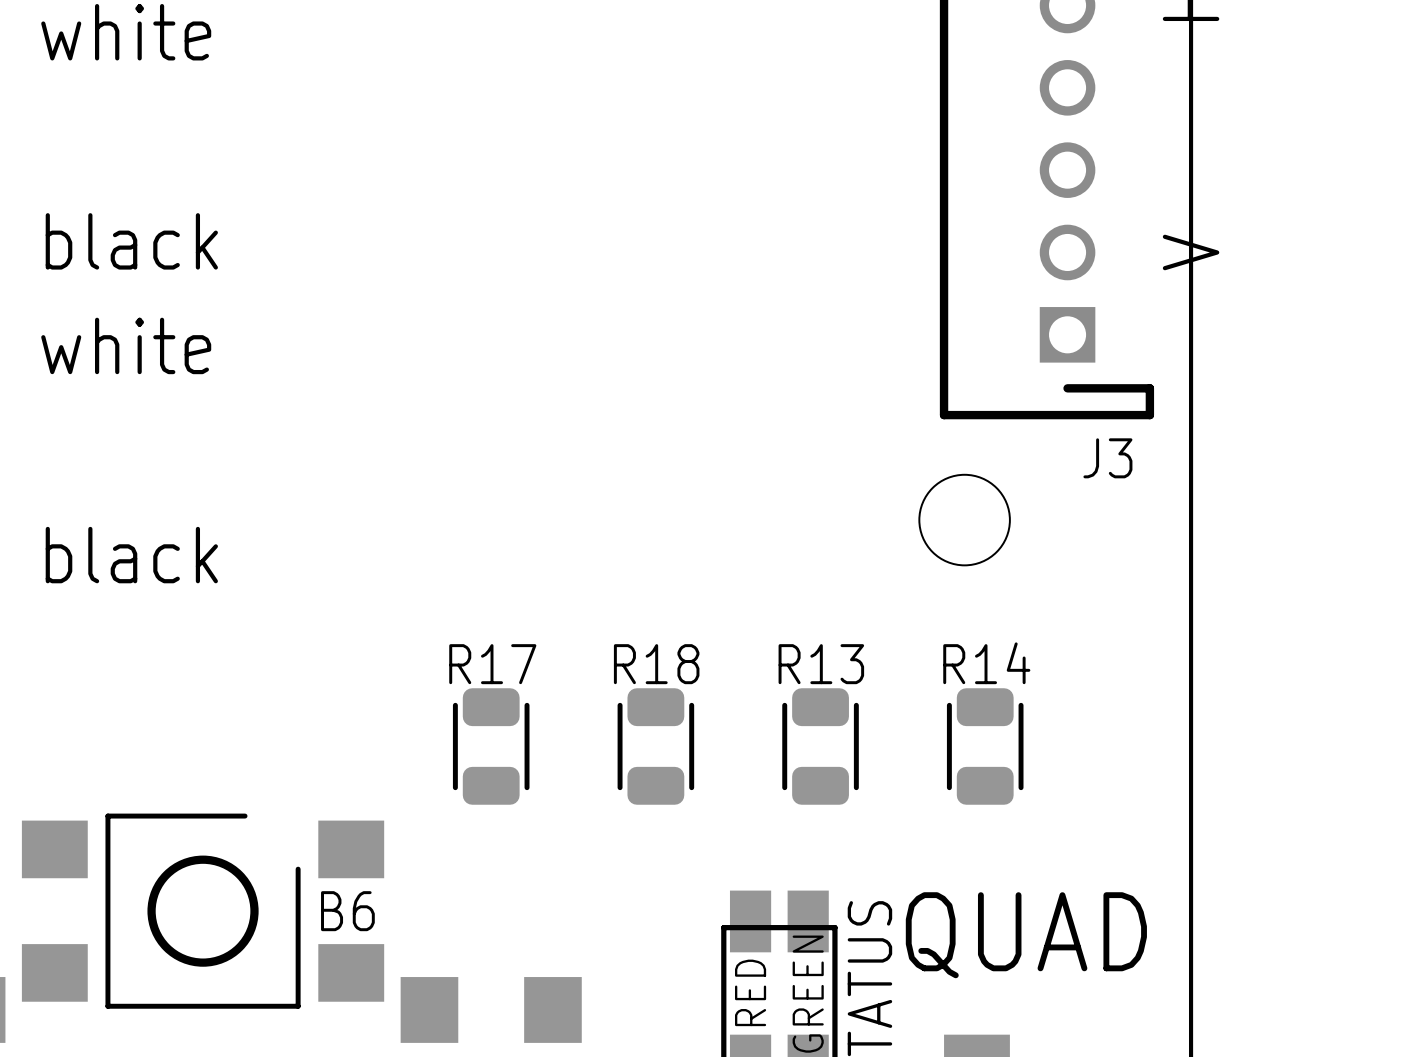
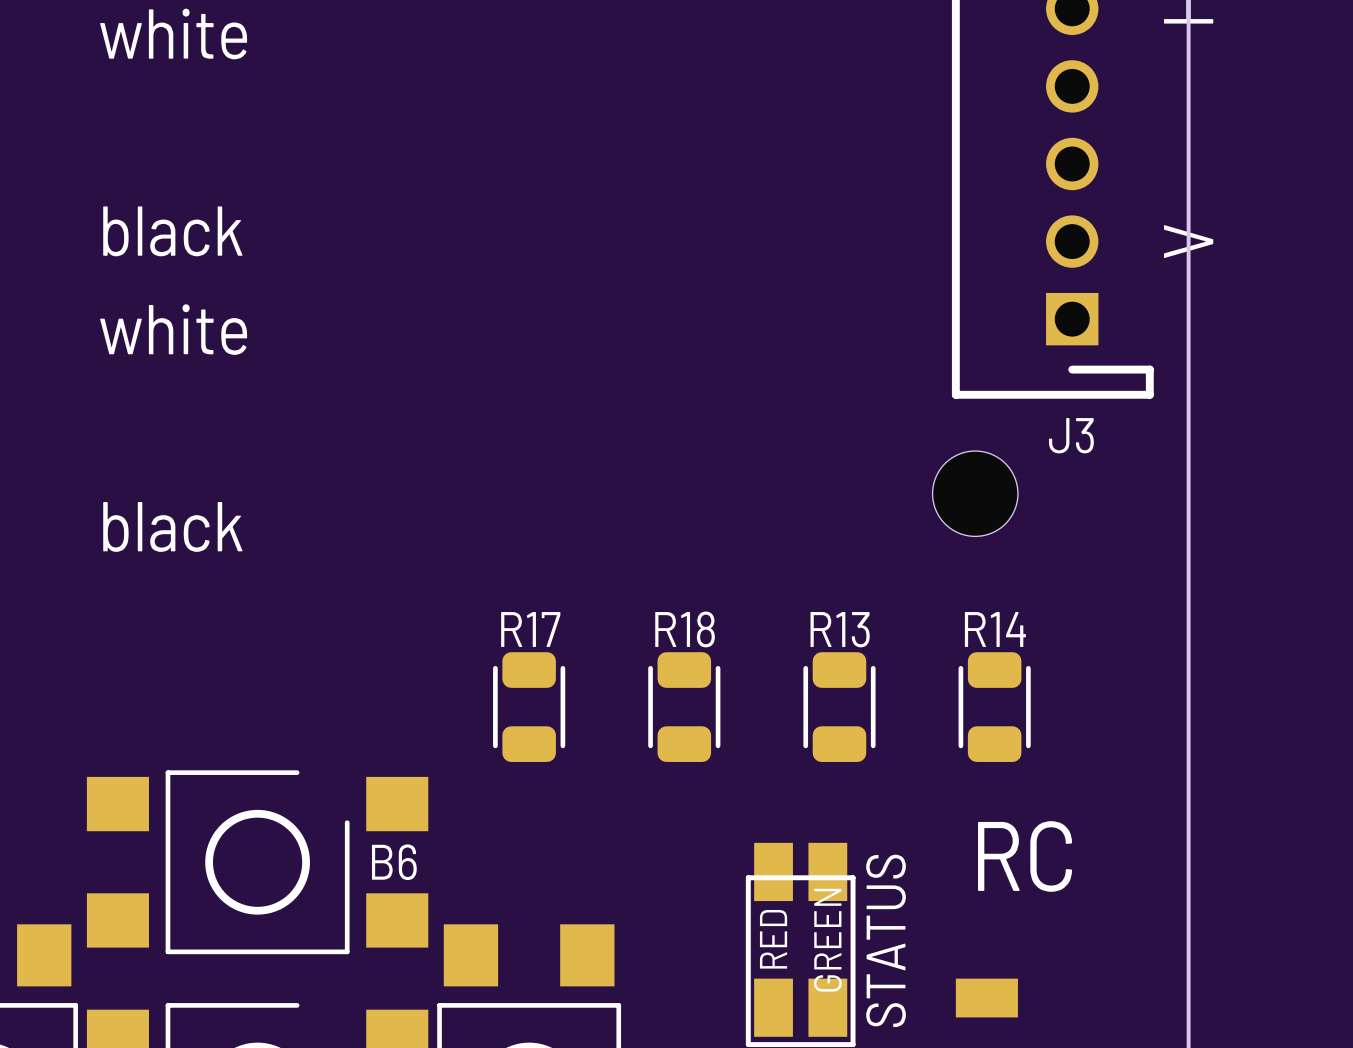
J3 name position: J3 (1107, 458) -> J3 (1071, 435)
text: QUAD (1026, 935) -> RC (1025, 856)

